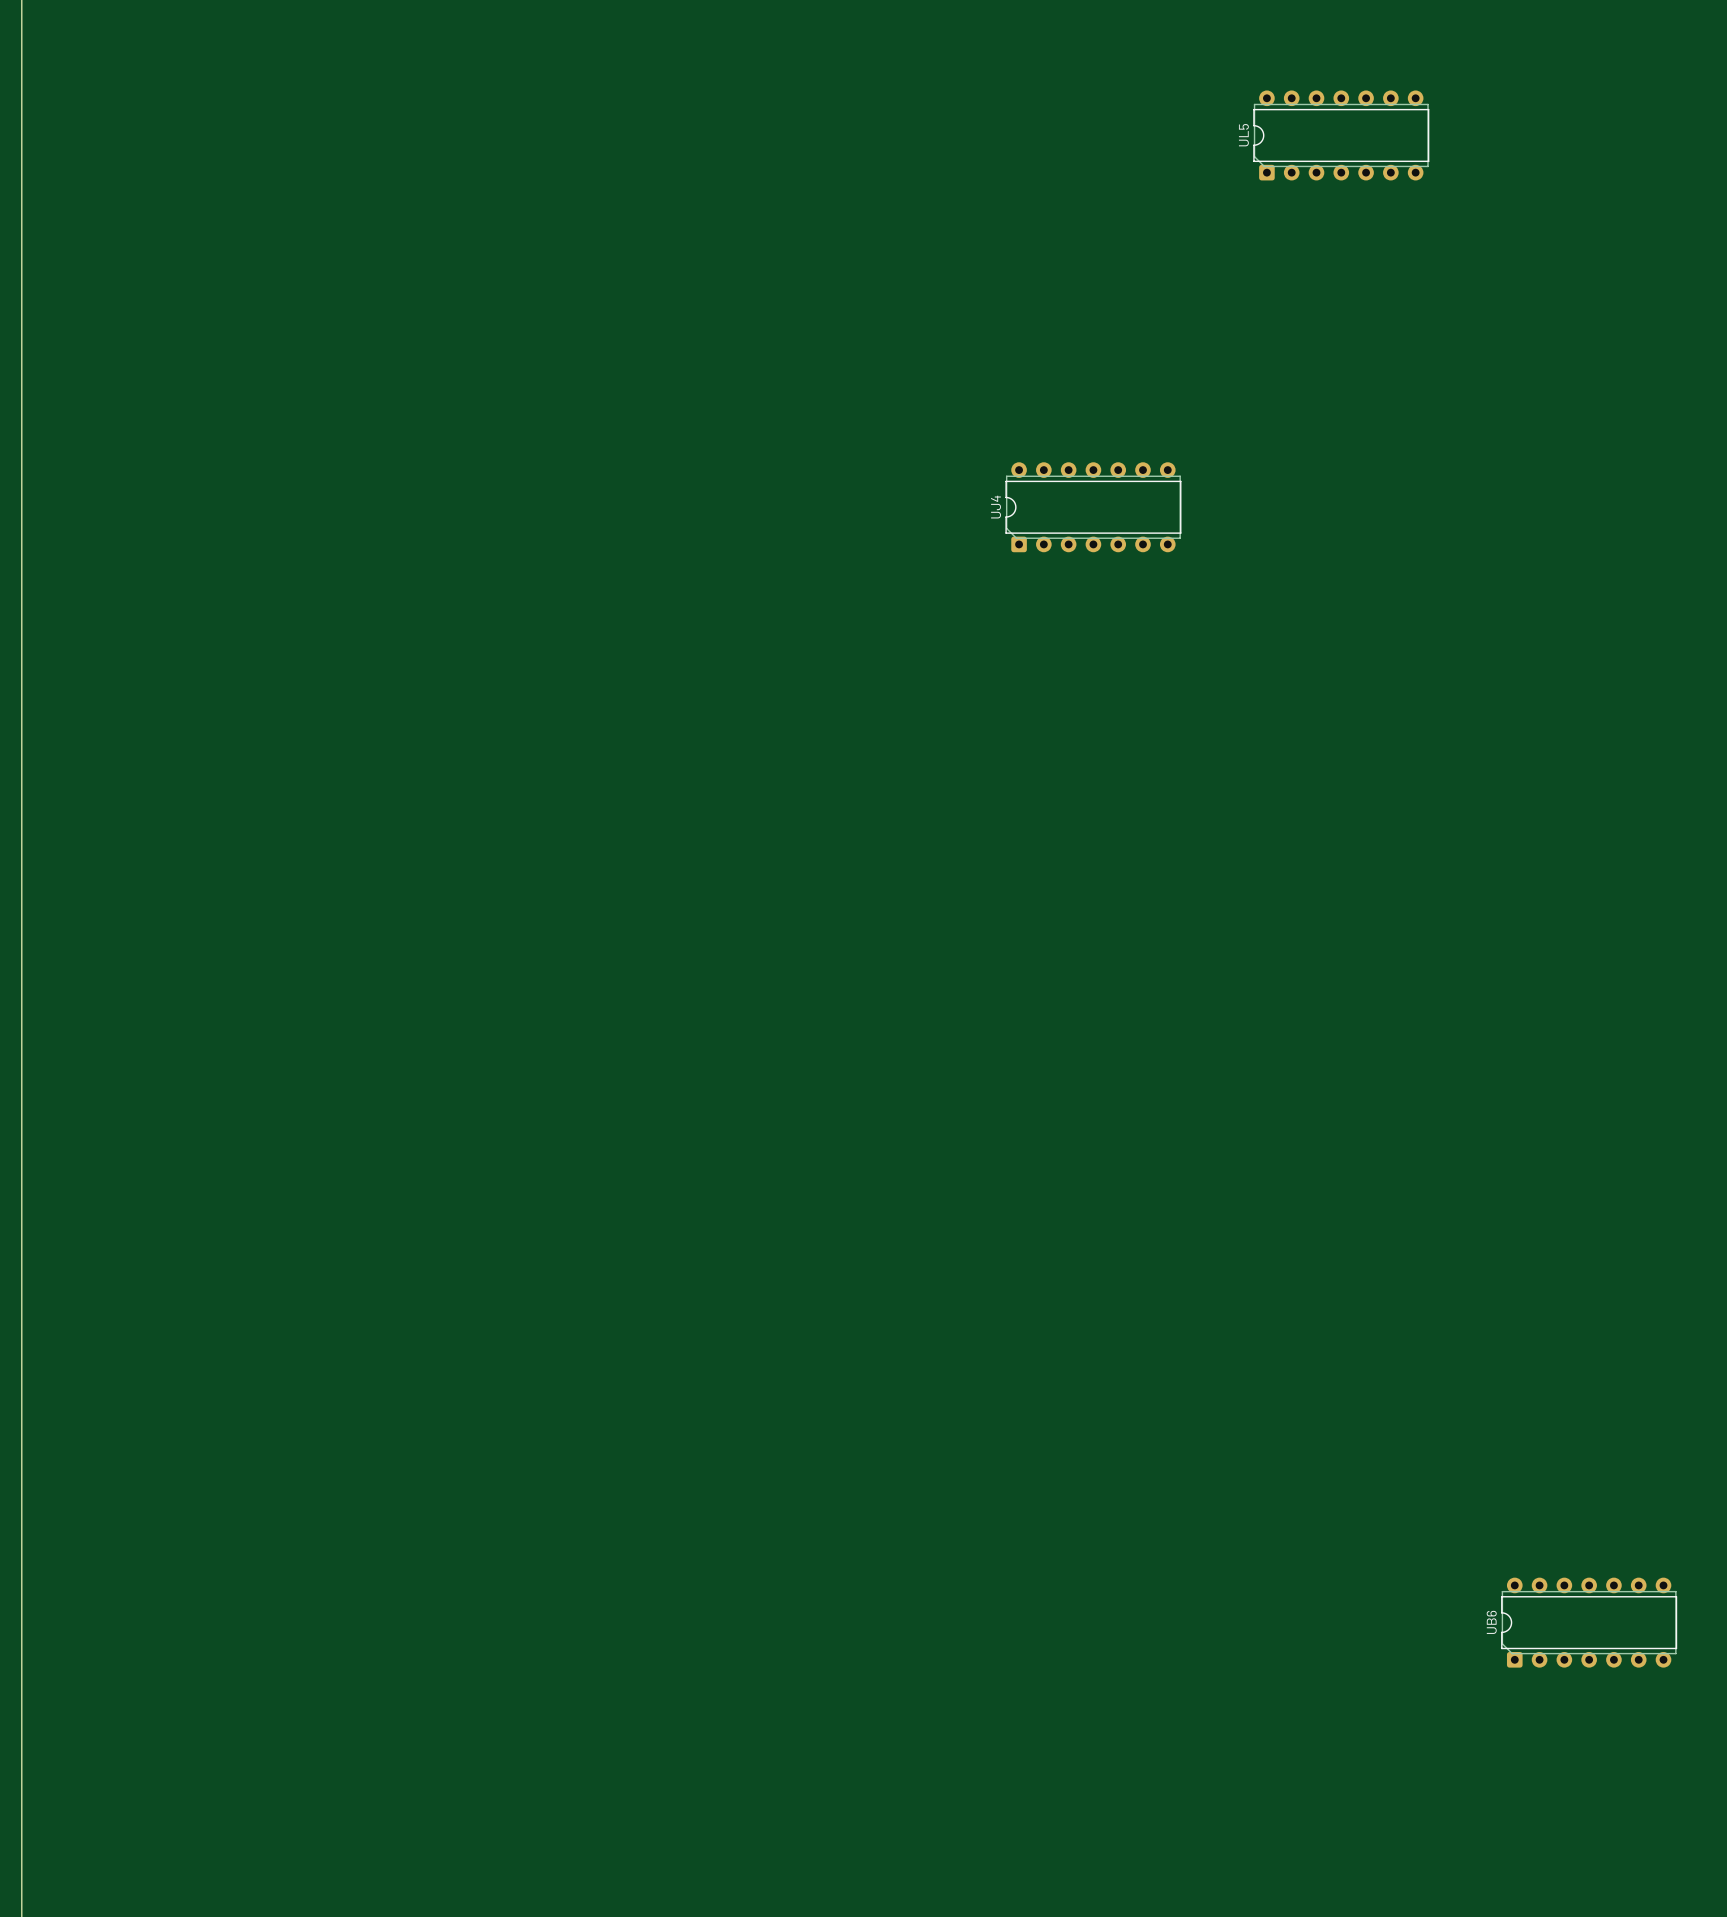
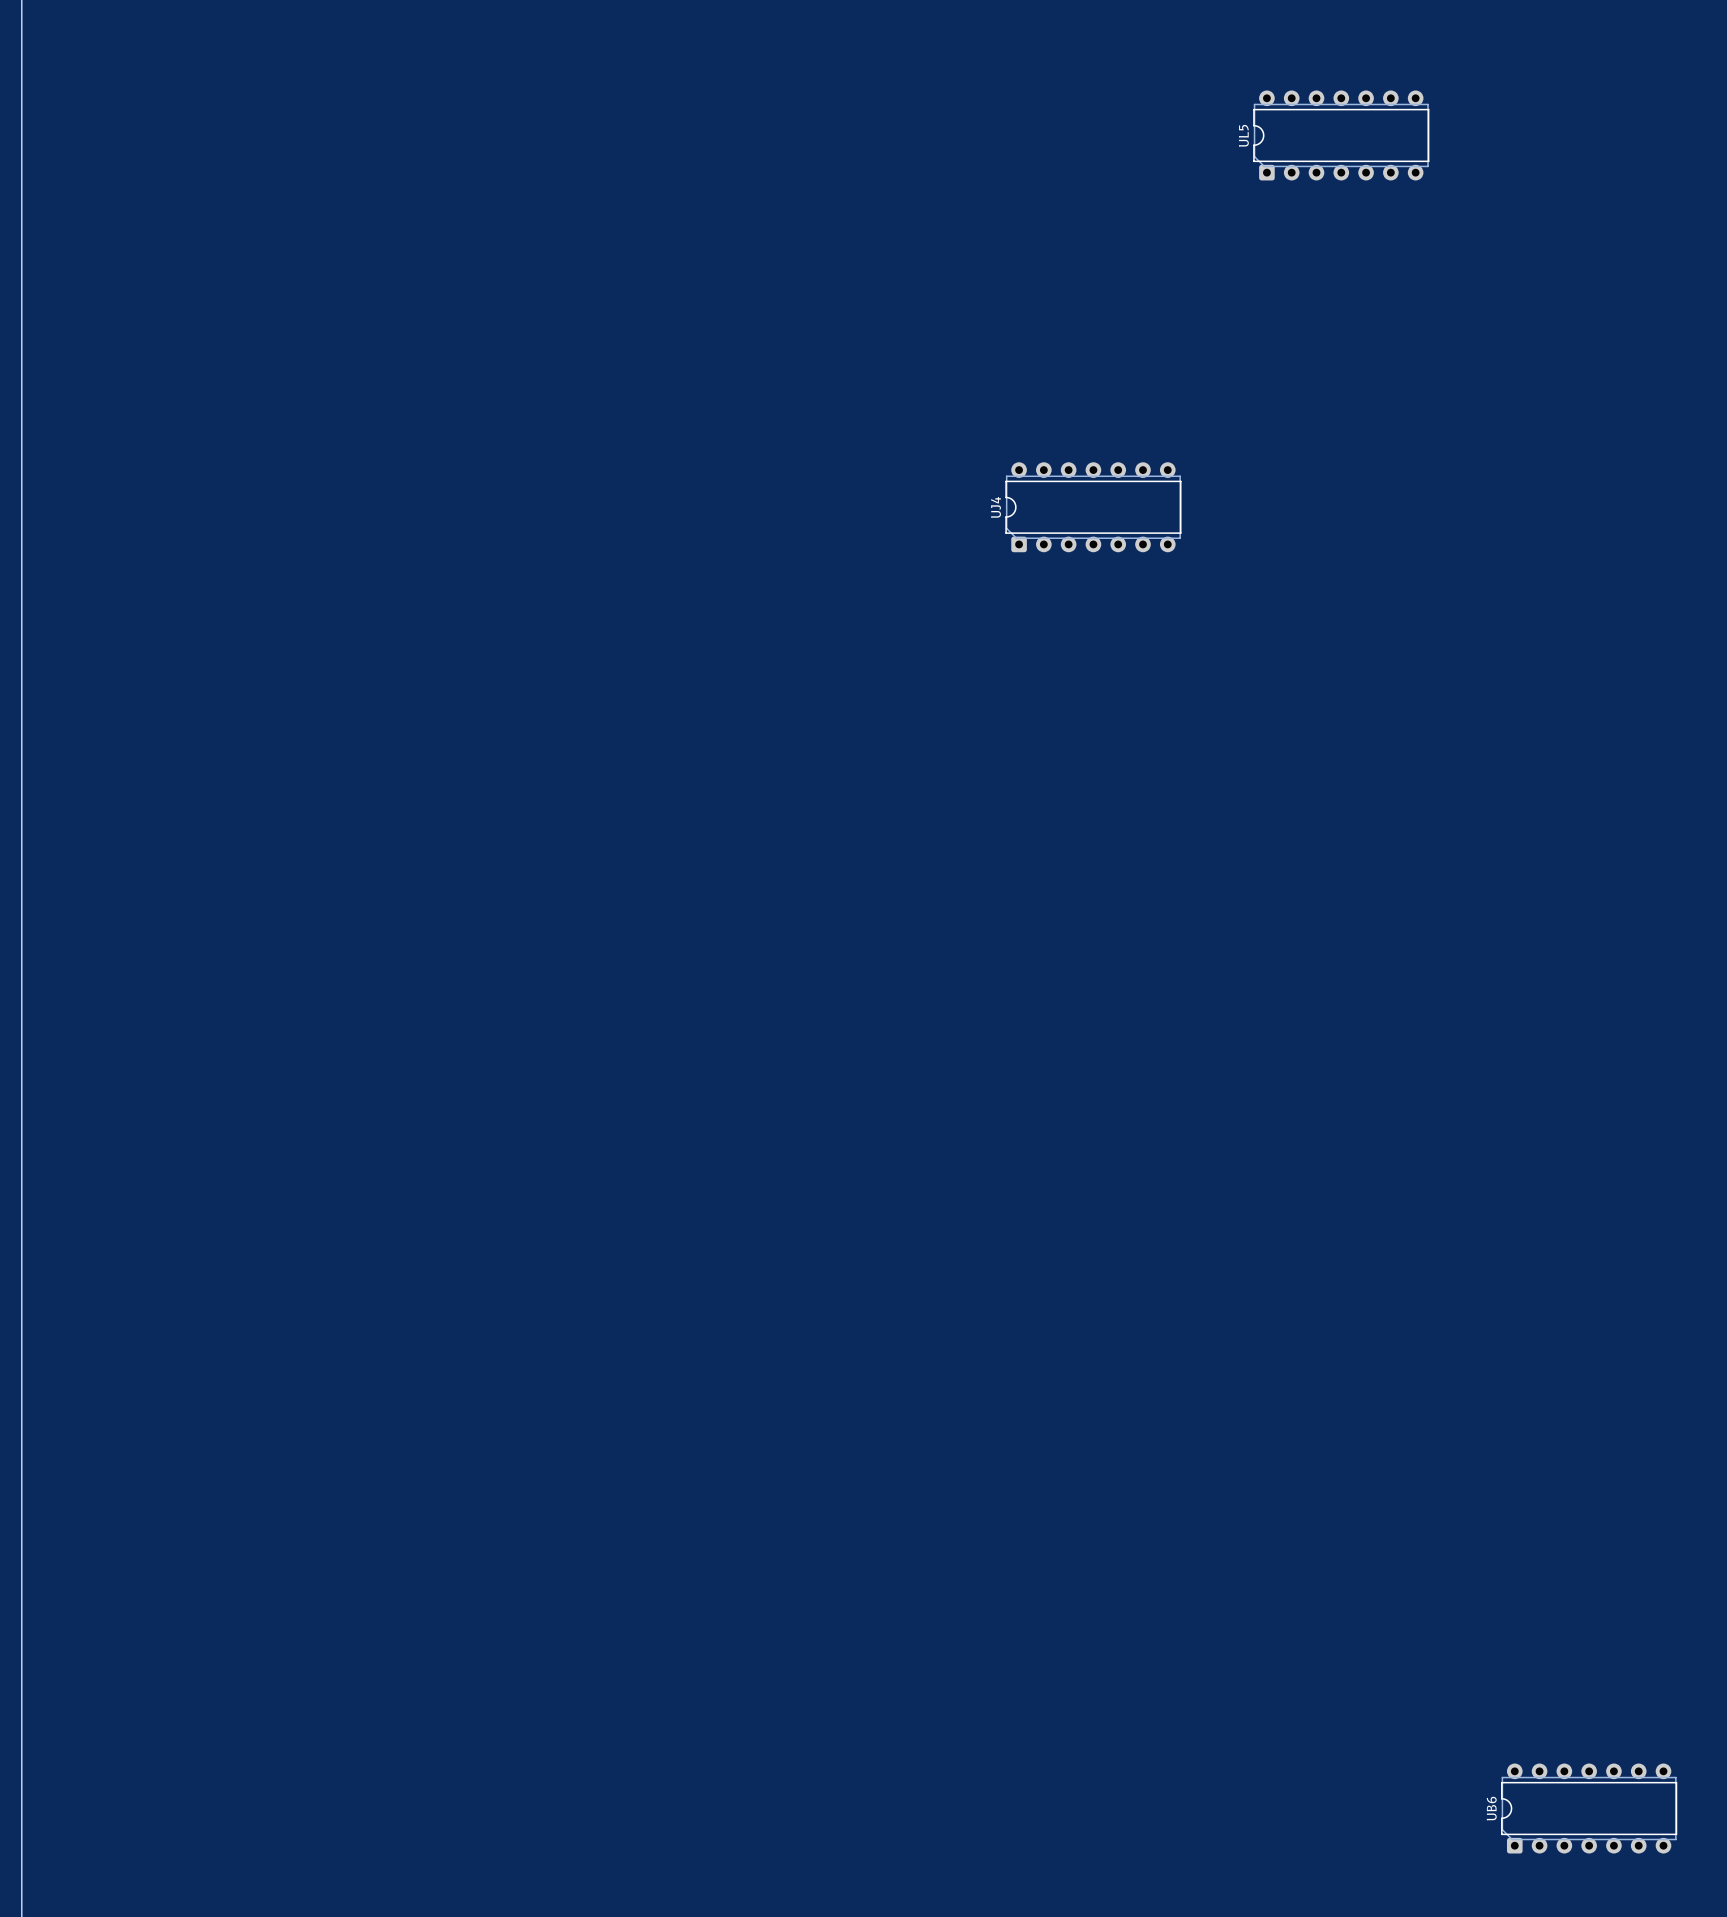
UB6 position: (1589, 1622) -> (1589, 1808)

